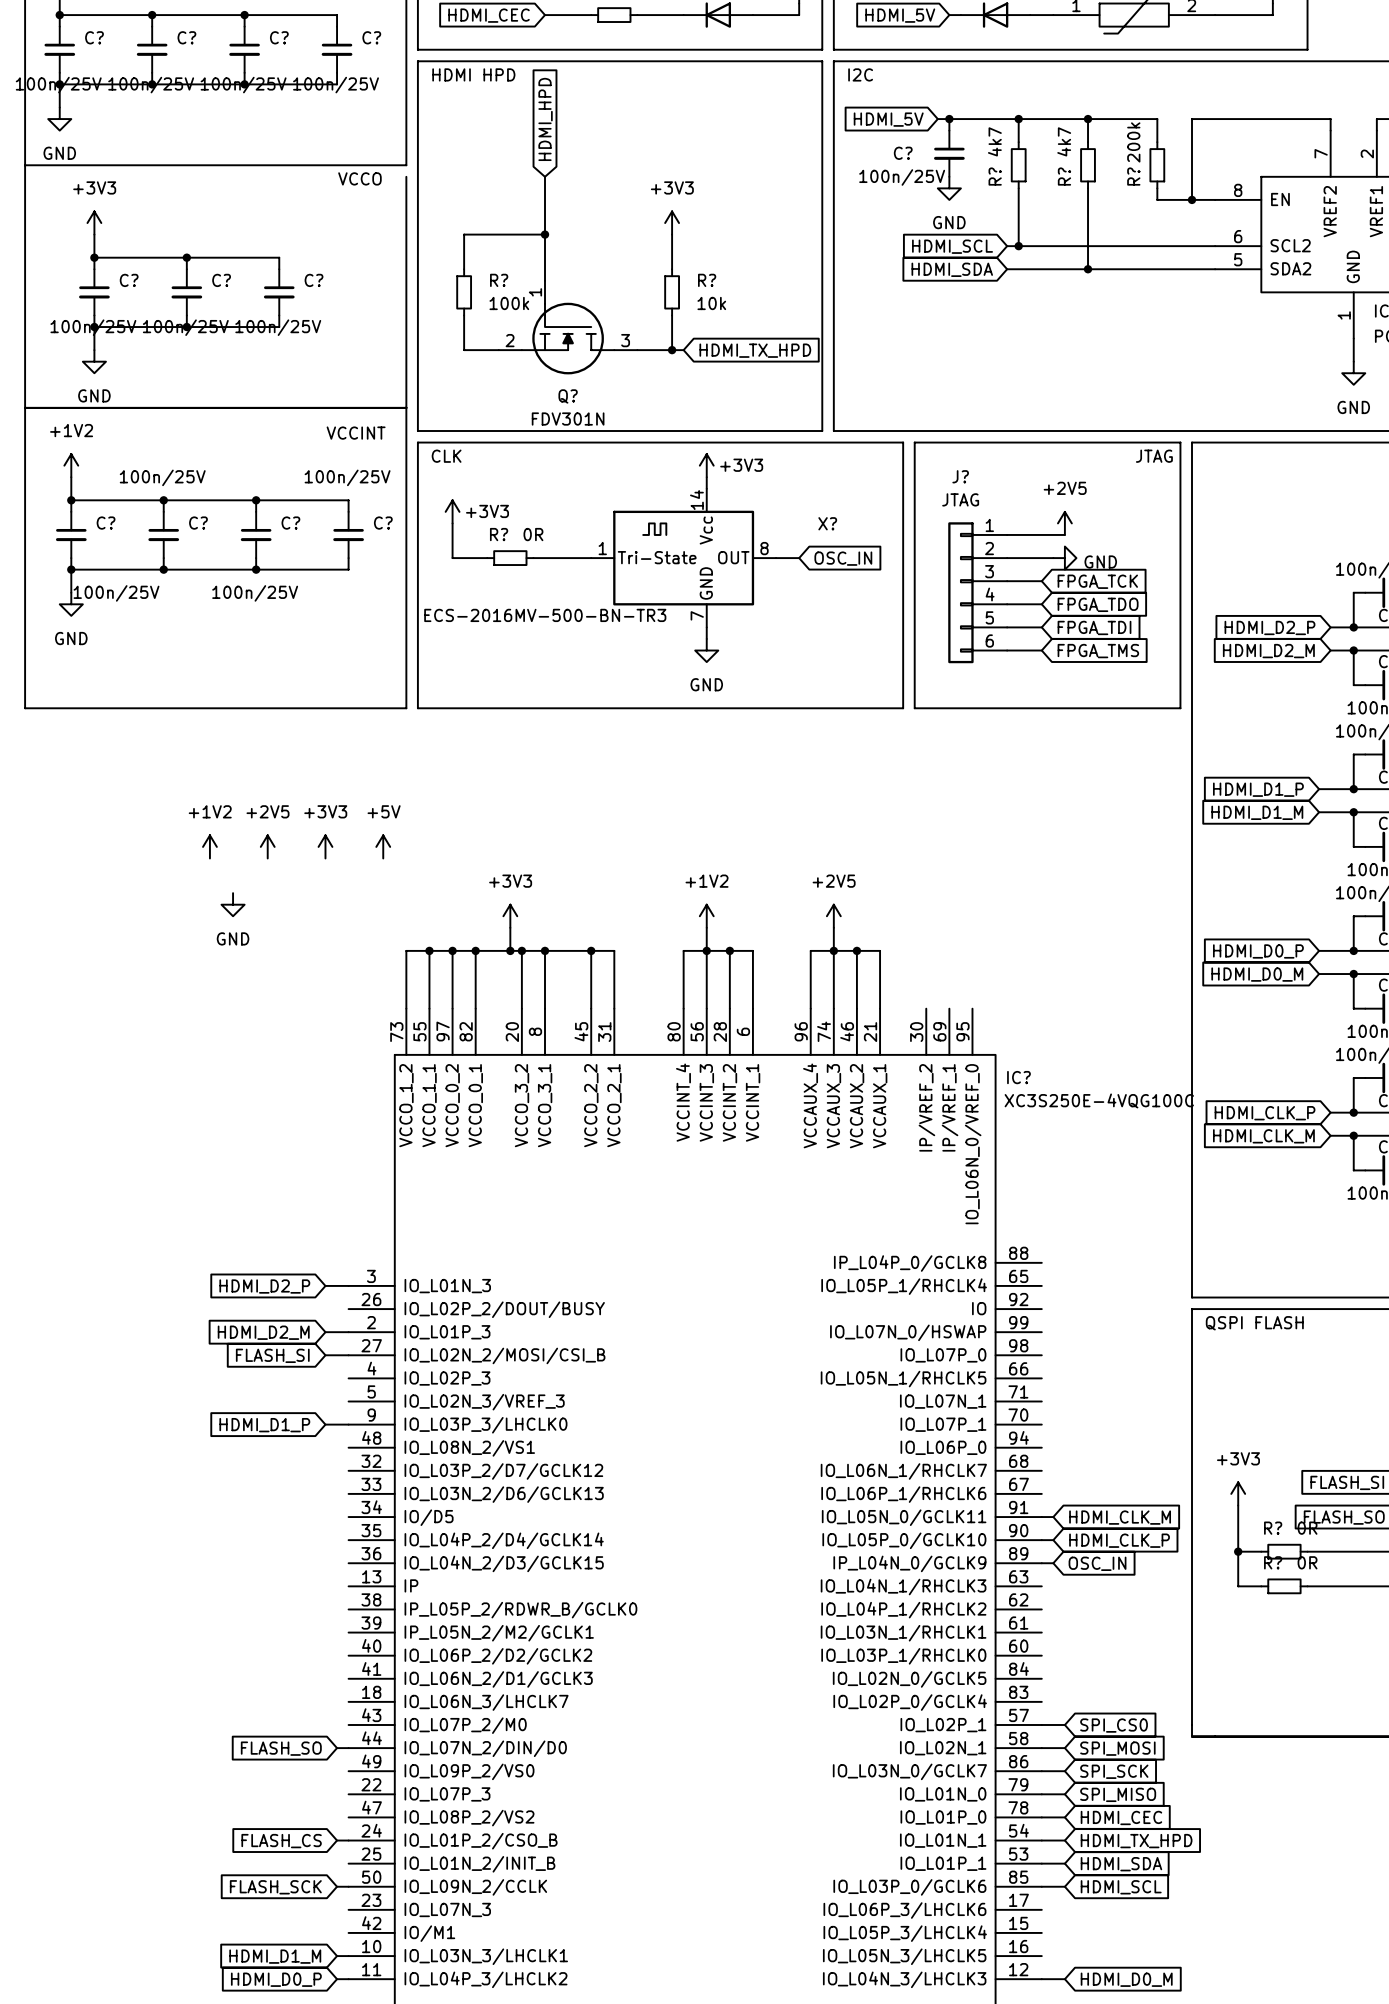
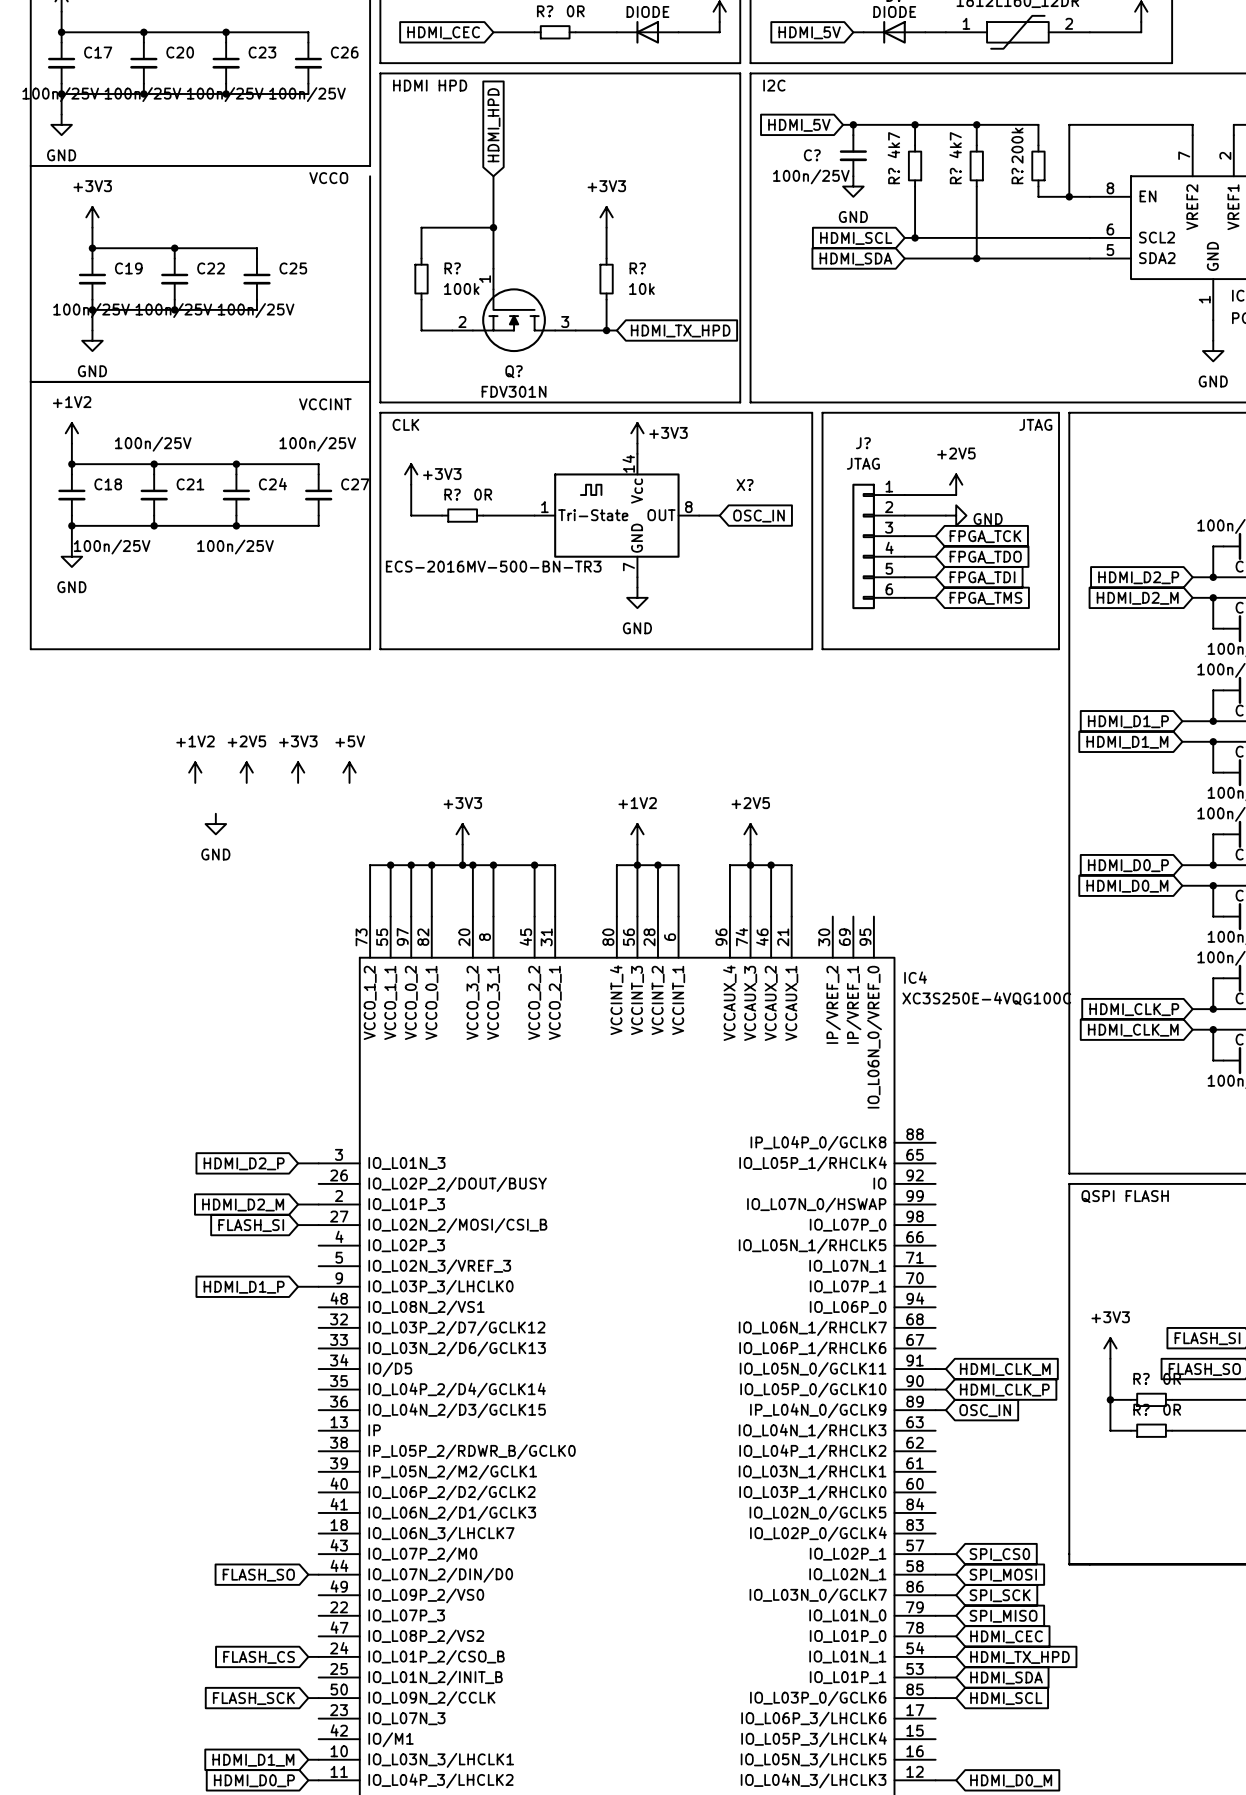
C? name: C? (94, 37) -> C17 (98, 52)
C? name: C? (186, 37) -> C20 (180, 52)
C? name: C? (279, 37) -> C23 (262, 52)
C? name: C? (371, 37) -> C26 (344, 52)
C? name: C? (129, 280) -> C19 (128, 268)
C? name: C? (221, 280) -> C22 (211, 268)
C? name: C? (314, 280) -> C25 (293, 268)
C? name: C? (106, 523) -> C18 (108, 484)
C? name: C? (198, 523) -> C21 (190, 484)
C? name: C? (290, 523) -> C24 (272, 484)
C? name: C? (383, 523) -> C27 (355, 484)
IC? name: IC? (1018, 1077) -> IC4 (915, 977)

